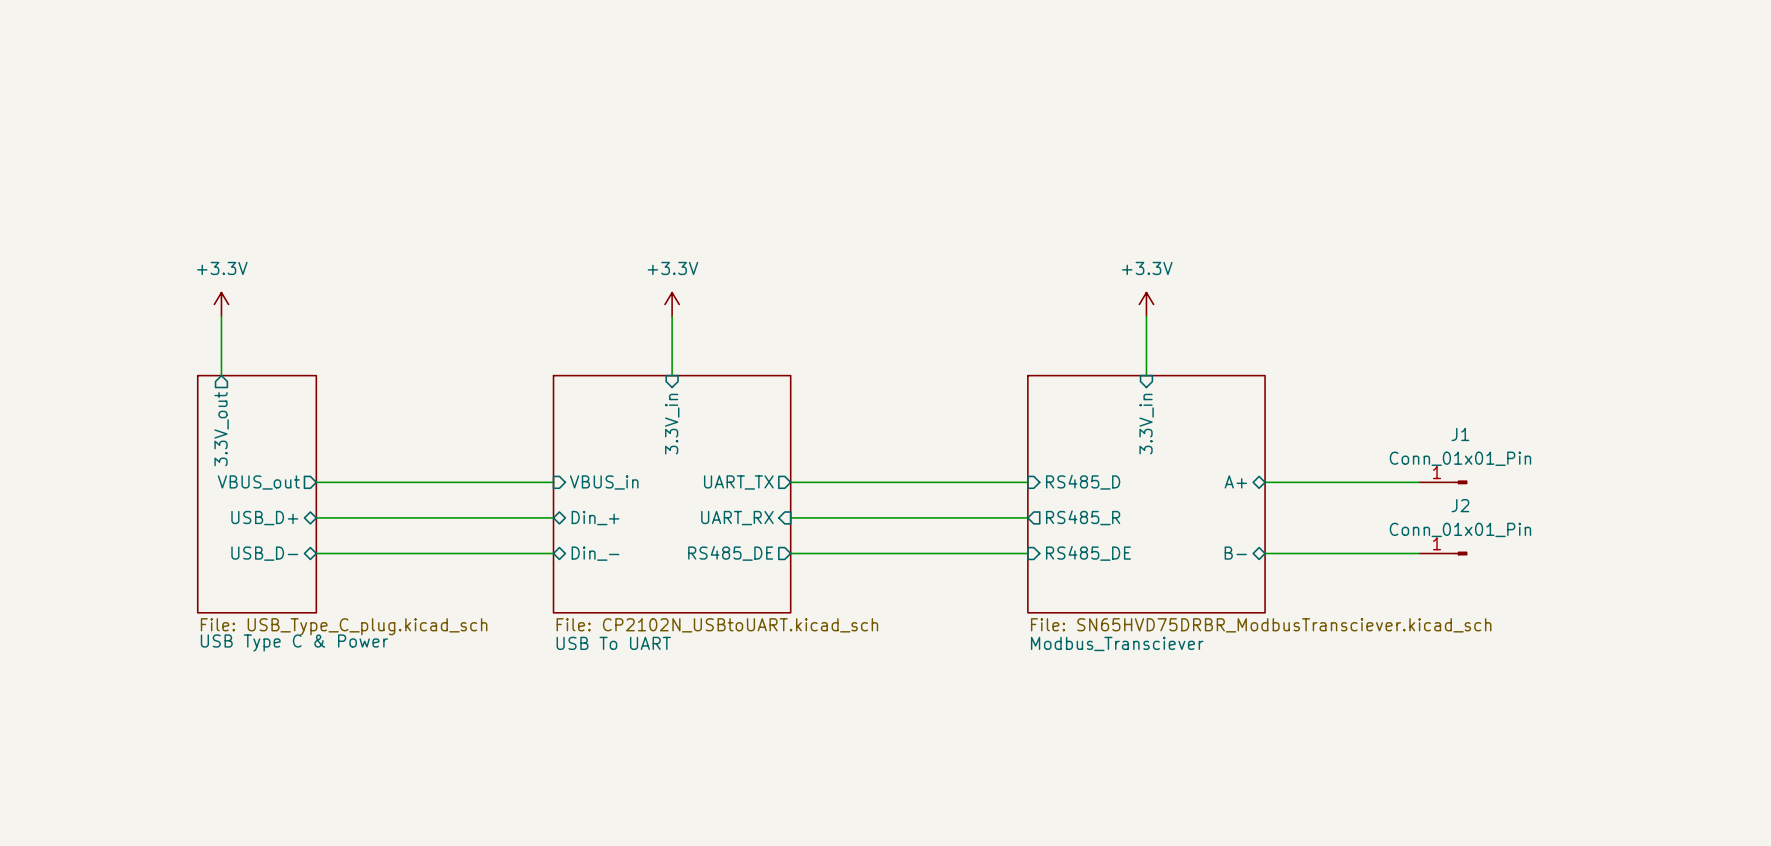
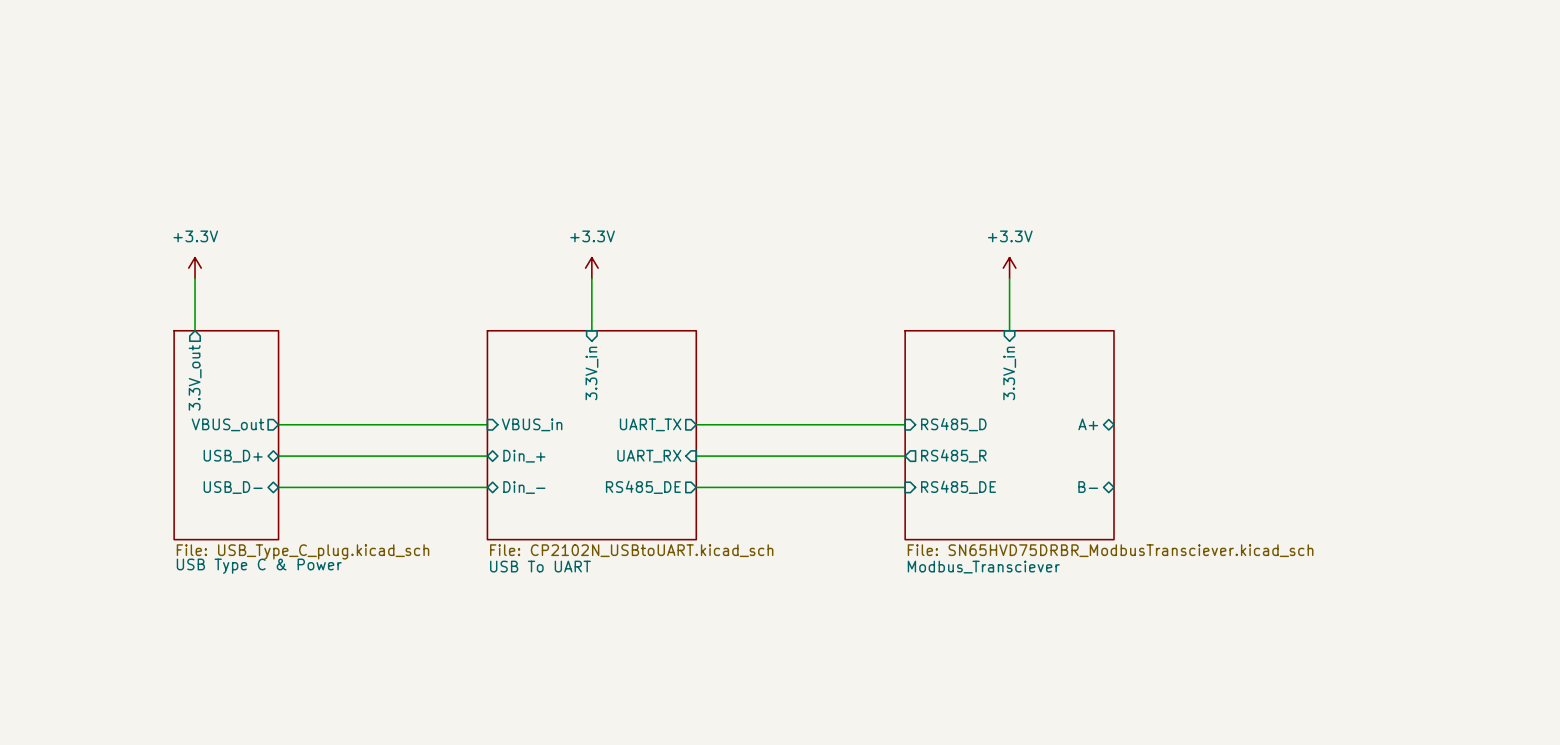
wire: (1265, 482) (1419, 482) -> none
J1: Conn_01x01_Pin (1443, 482) -> none
wire: (1265, 553) (1419, 553) -> none
J2: Conn_01x01_Pin (1443, 553) -> none

